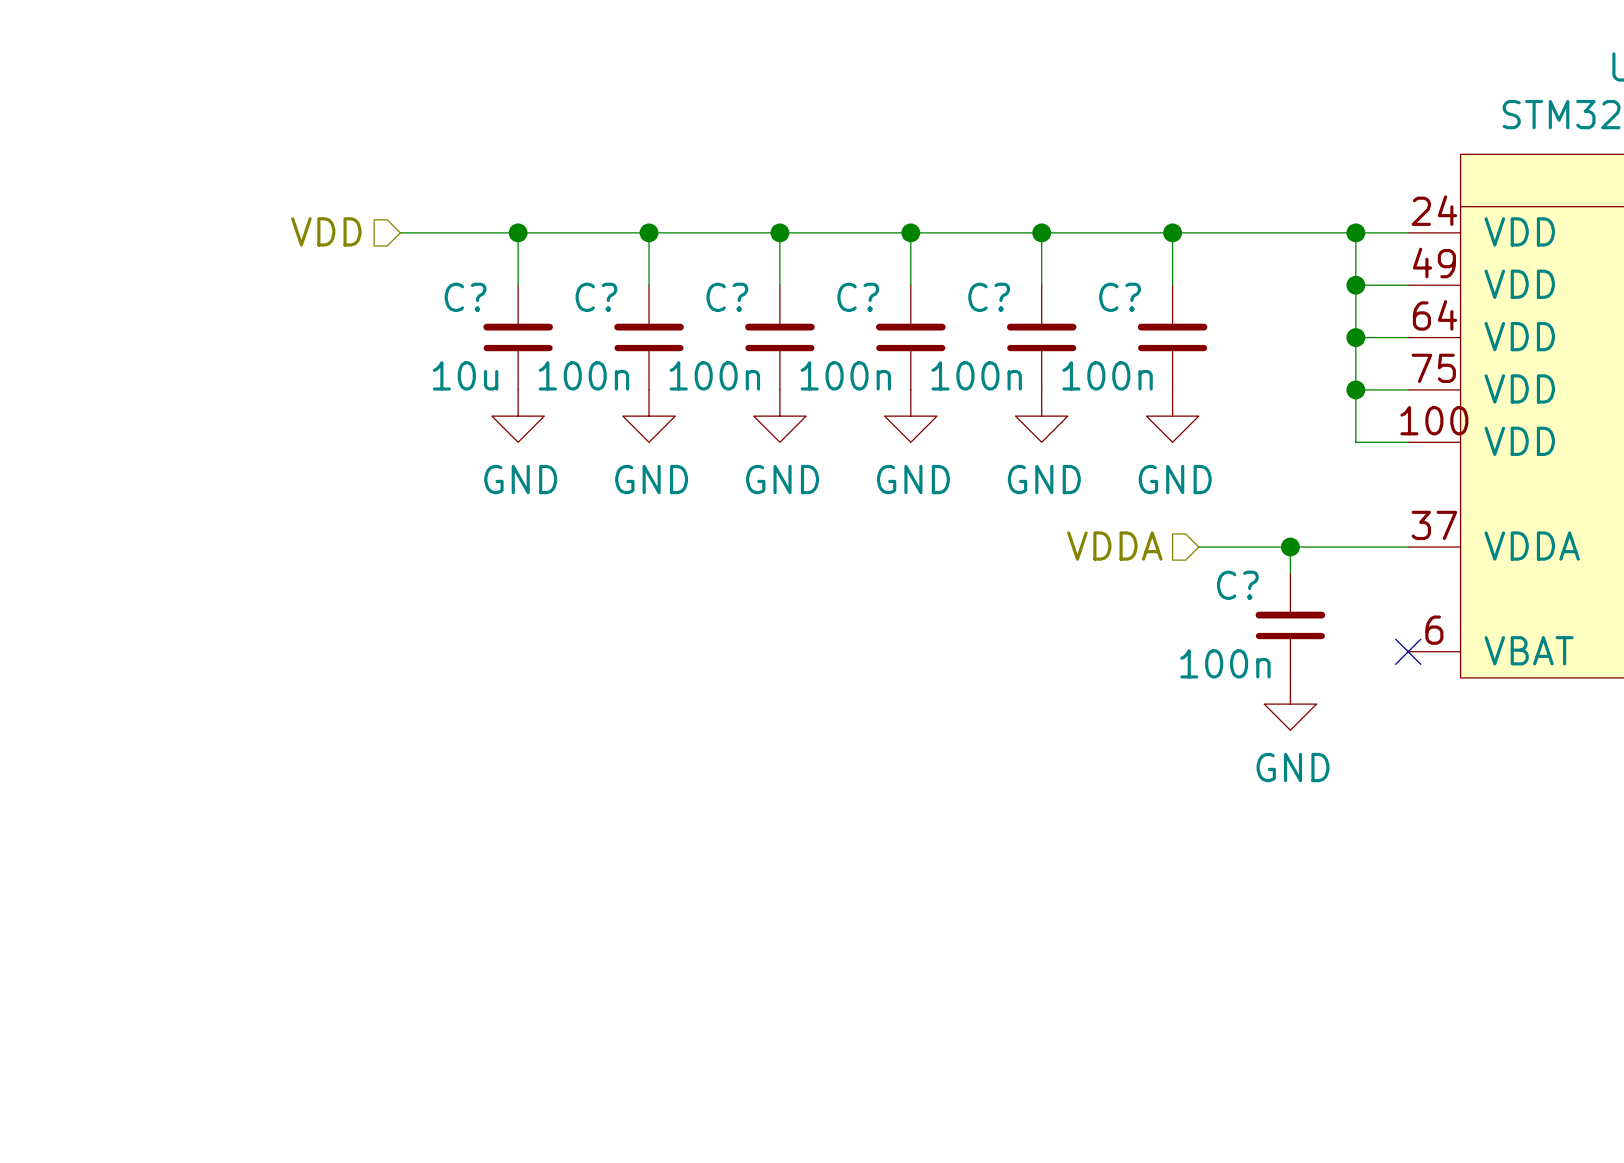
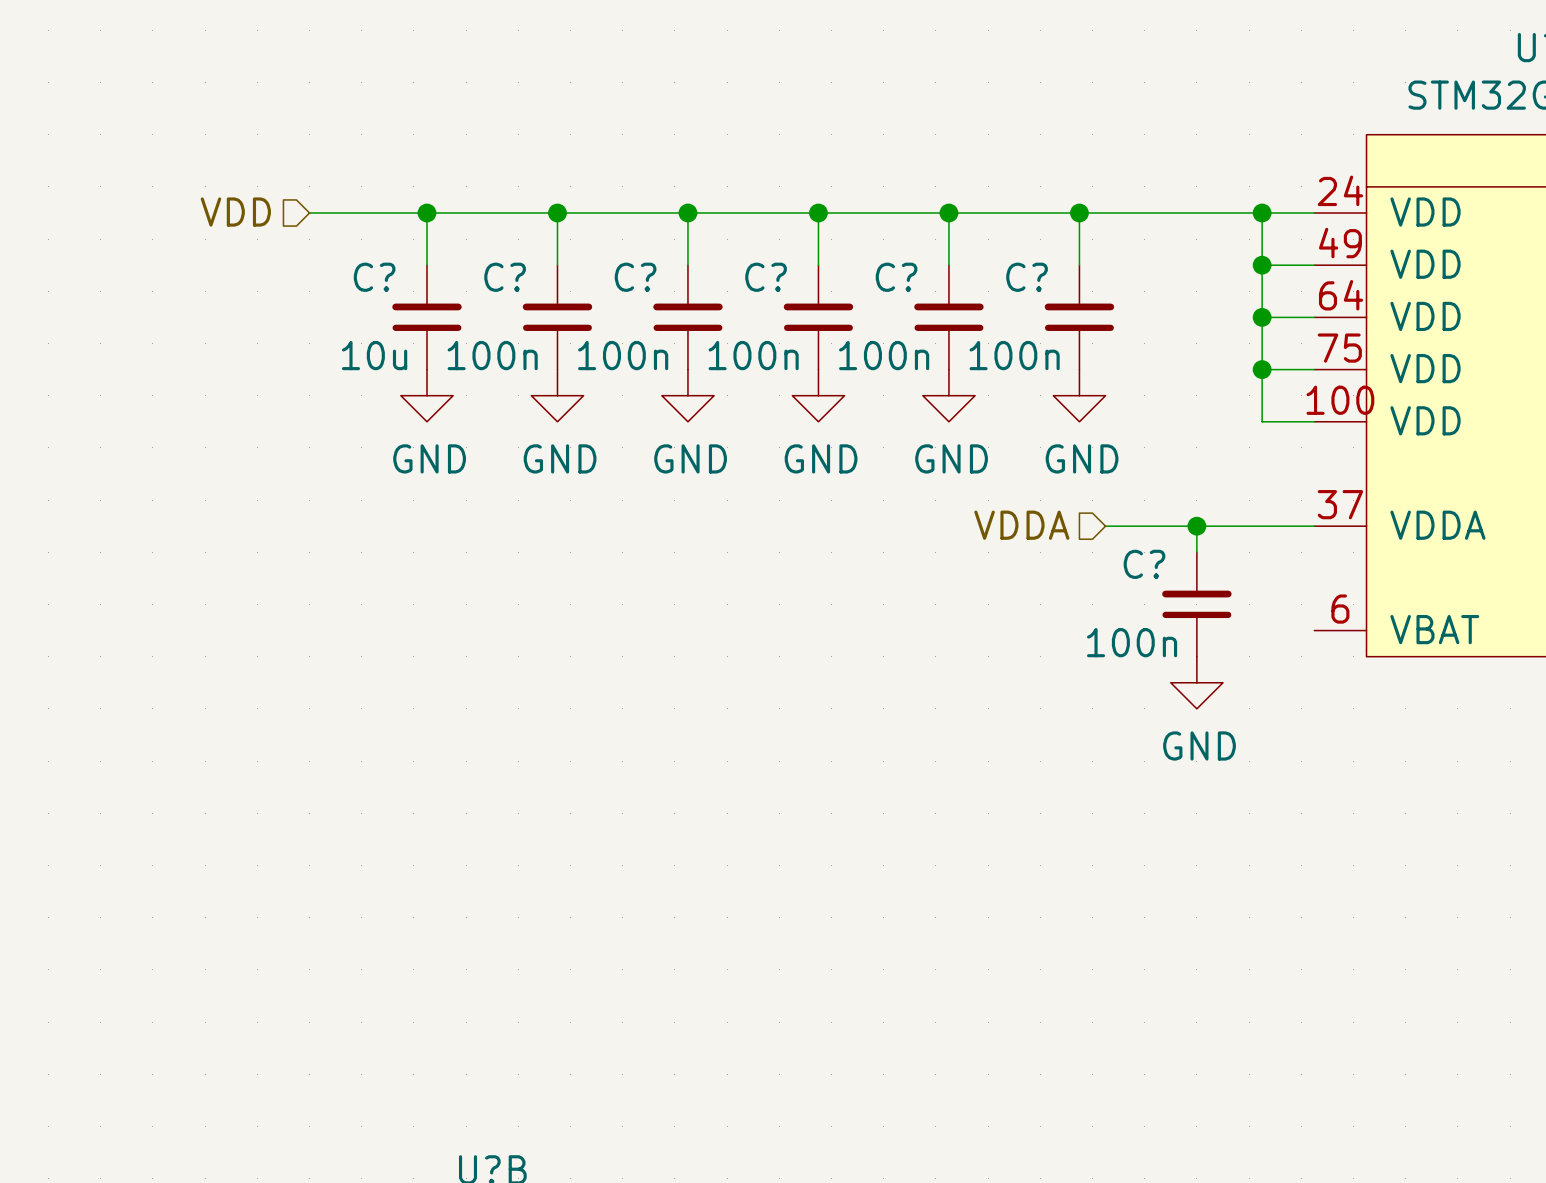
no-connect mark: (1408, 651) -> none

